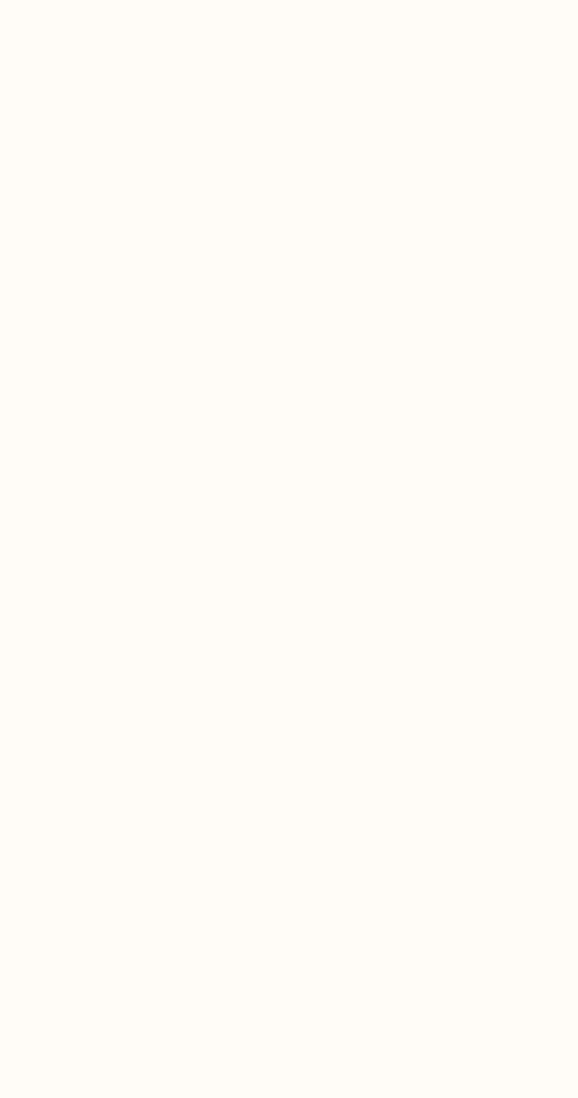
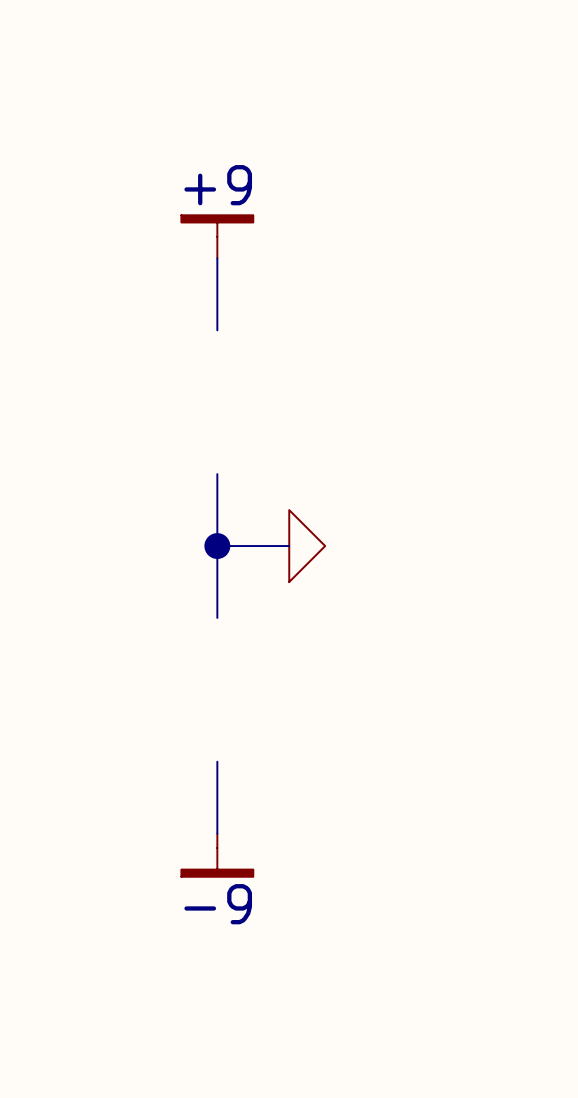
power symbol: none -> +9 (217, 236)
wire: none -> (217, 258) (217, 330)
wire: none -> (217, 474) (217, 617)
wire: none -> (217, 546) (289, 546)
junction: none -> (217, 546)
power symbol: none -> (307, 546)
wire: none -> (217, 761) (217, 833)
power symbol: none -> -9 (217, 855)

